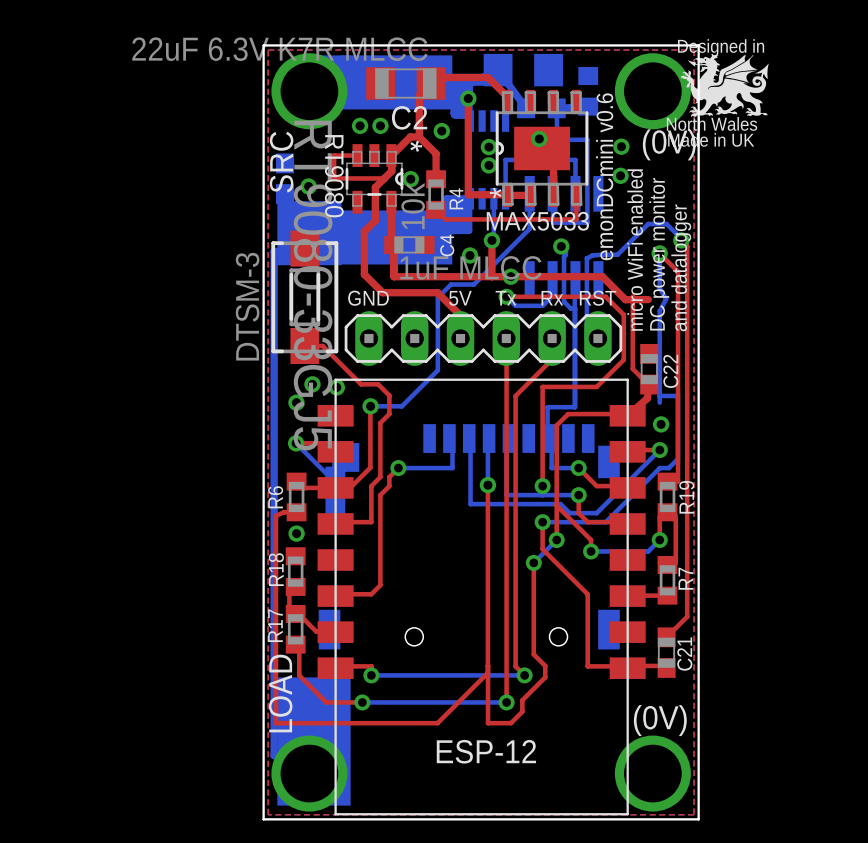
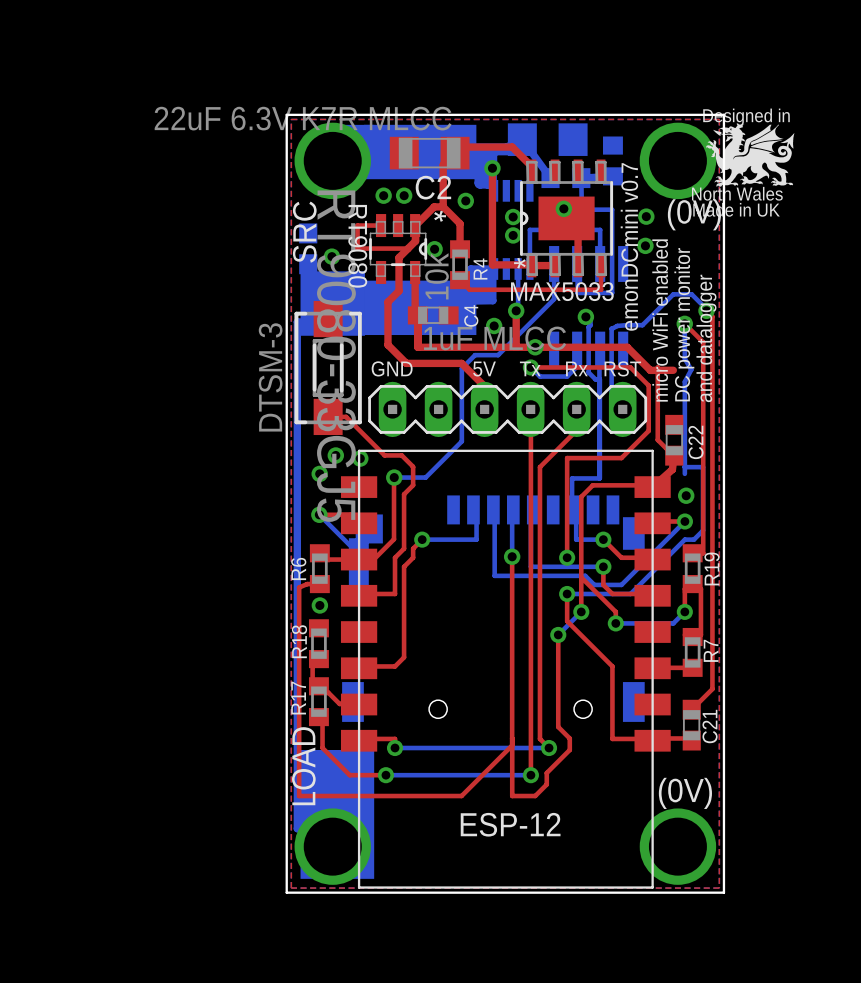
text: emonDCmini v0.6 (604, 176) -> emonDCmini v0.7 (629, 246)

